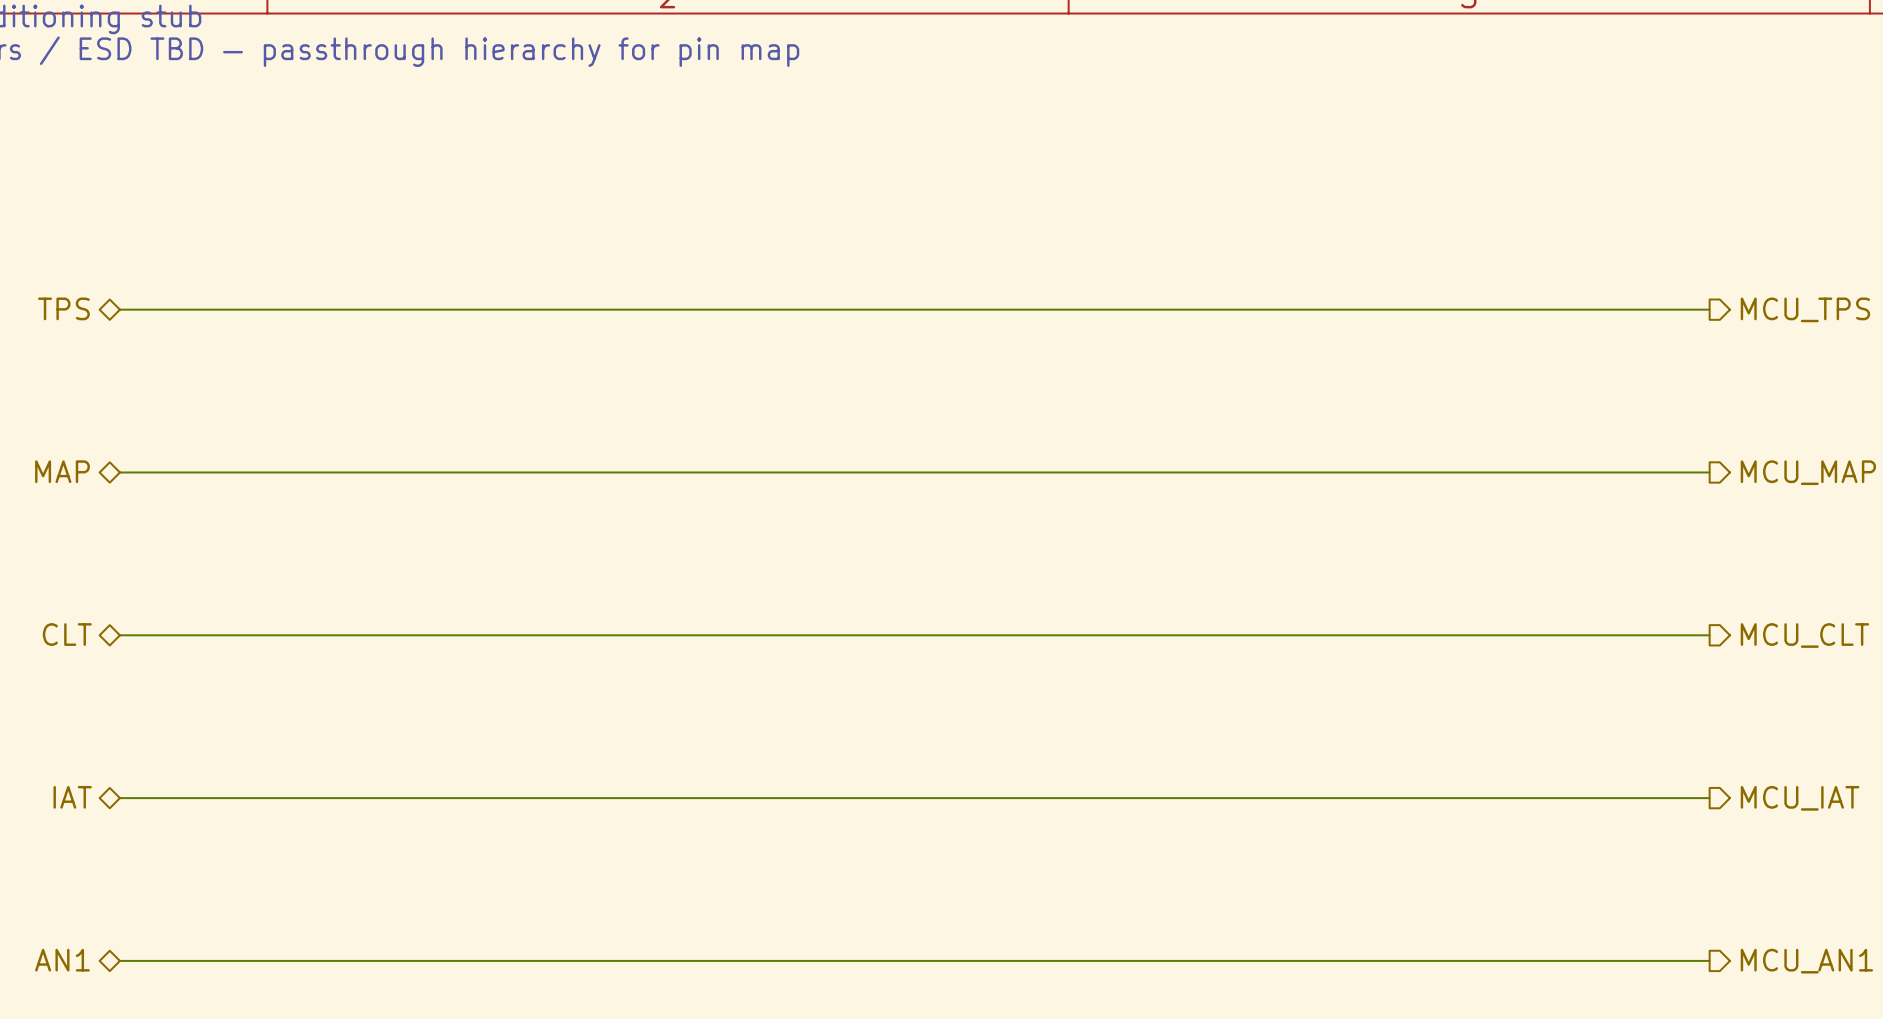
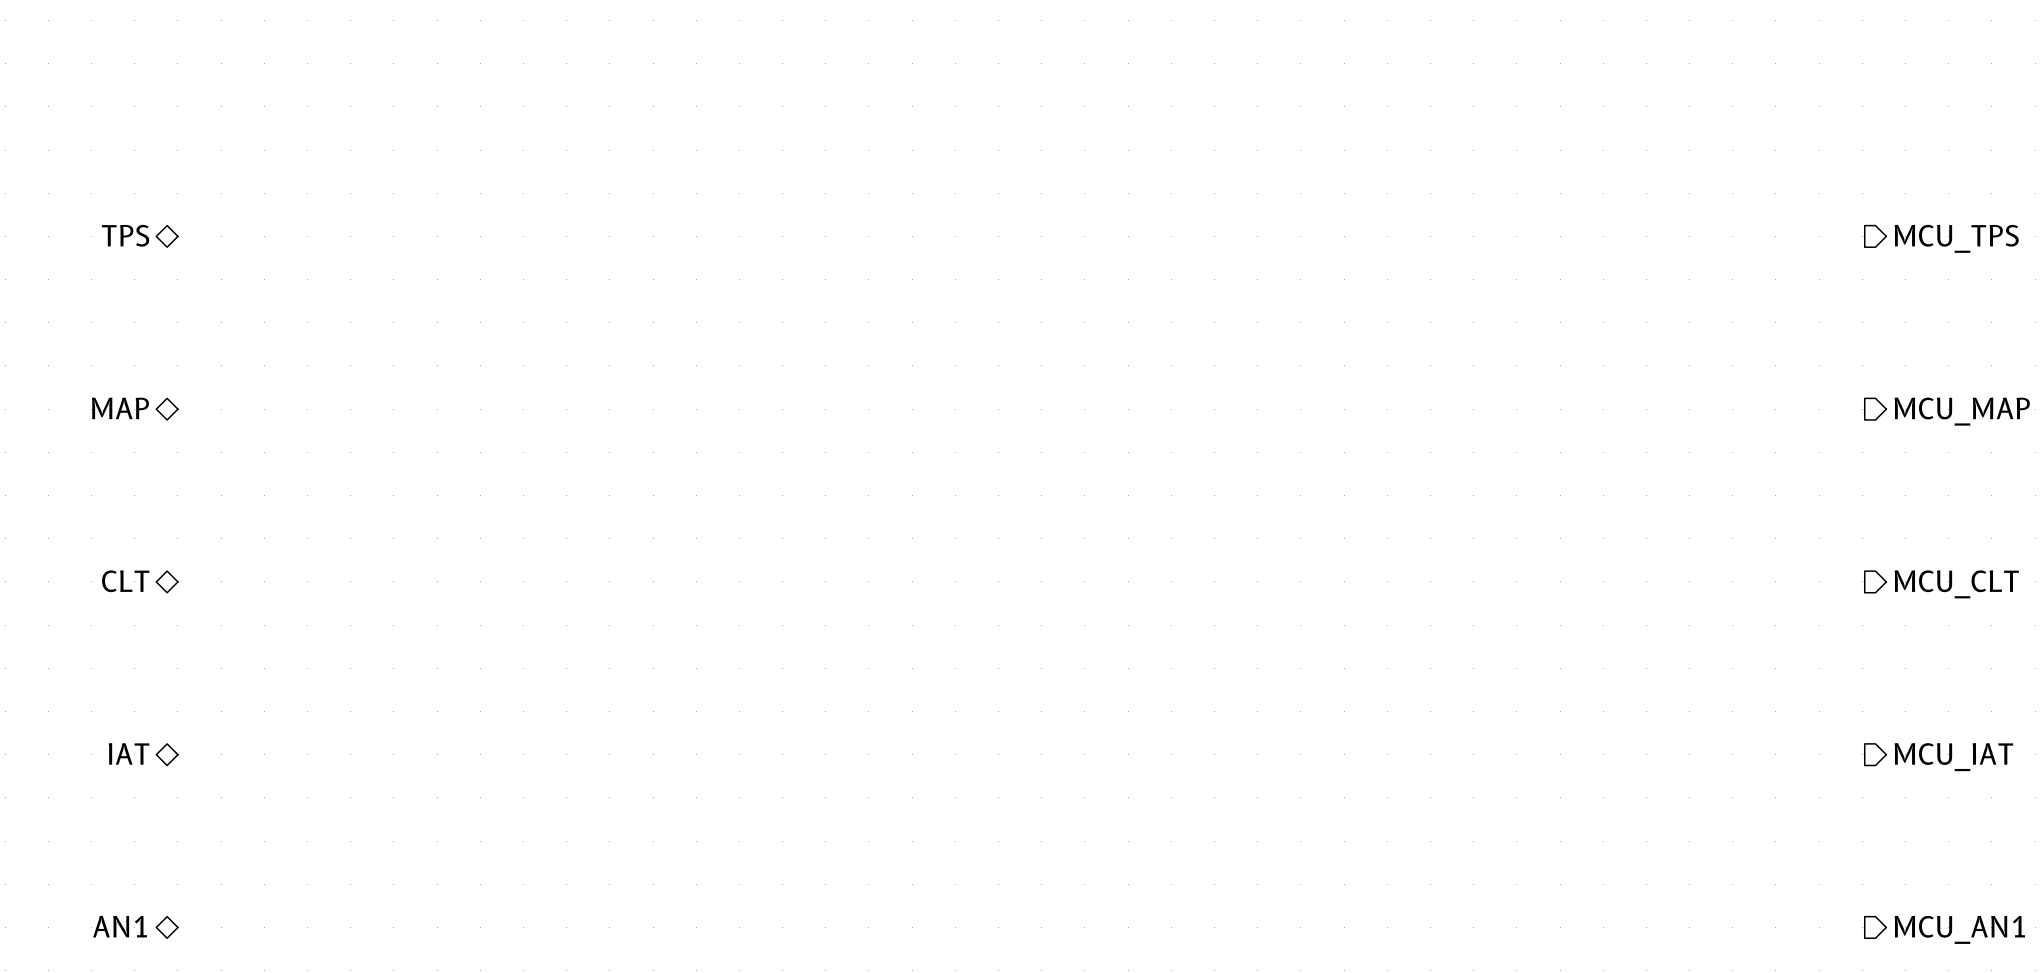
wire: (119, 309) (1709, 309) -> none
wire: (119, 472) (1709, 472) -> none
wire: (119, 635) (1709, 635) -> none
wire: (119, 798) (1709, 798) -> none
wire: (119, 960) (1709, 960) -> none

